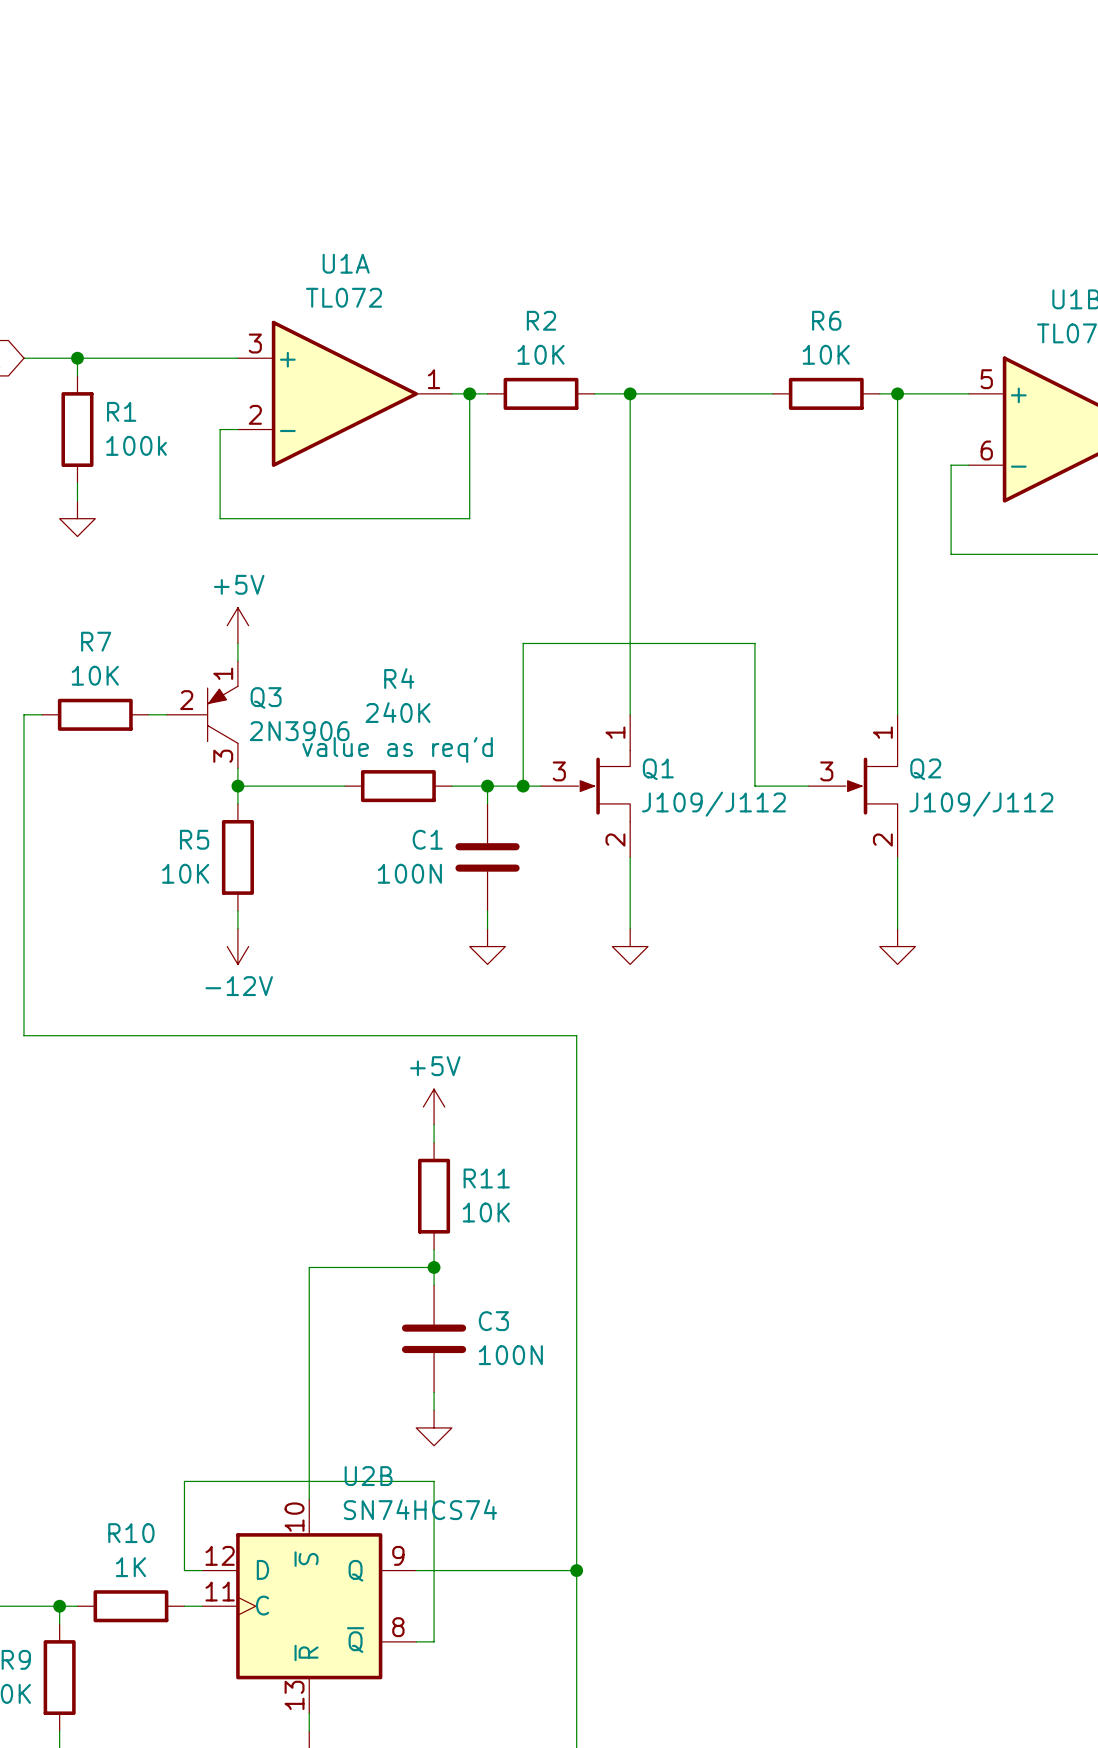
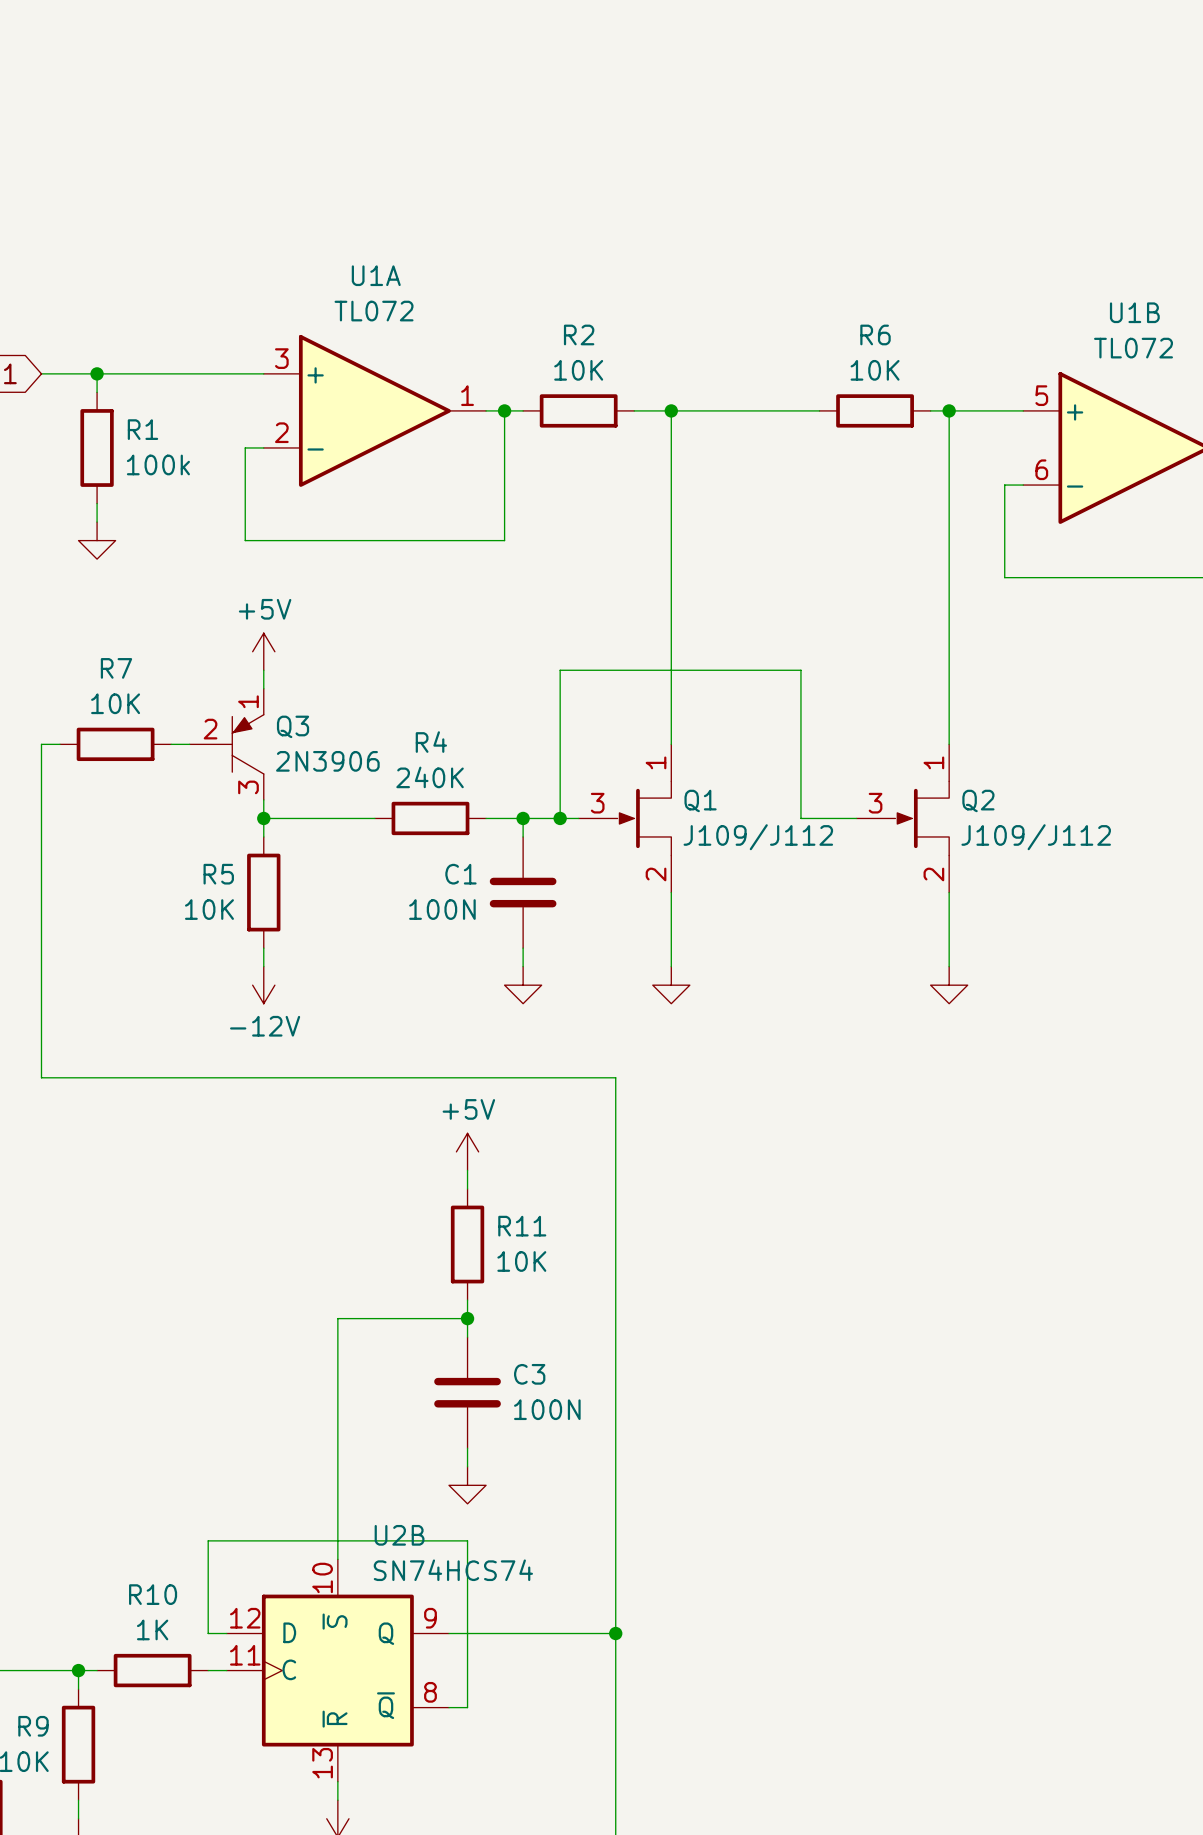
R4 name position: R4 (399, 678) -> R4 (431, 742)
R4 value position: 240K (397, 712) -> 240K (430, 777)
R4 text: value as req'd (397, 750) -> none

